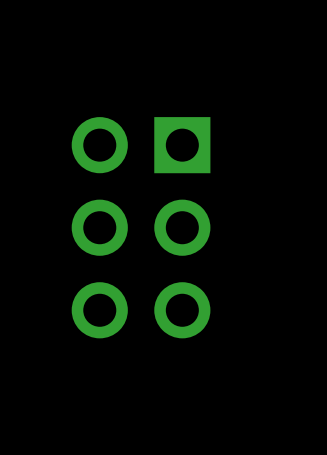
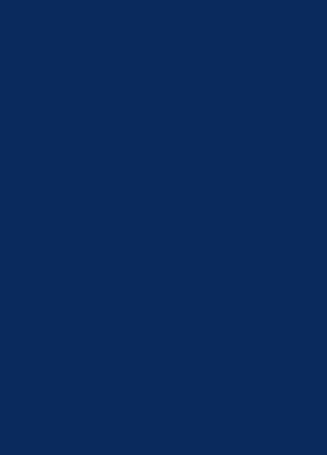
part: (141, 227) -> none

